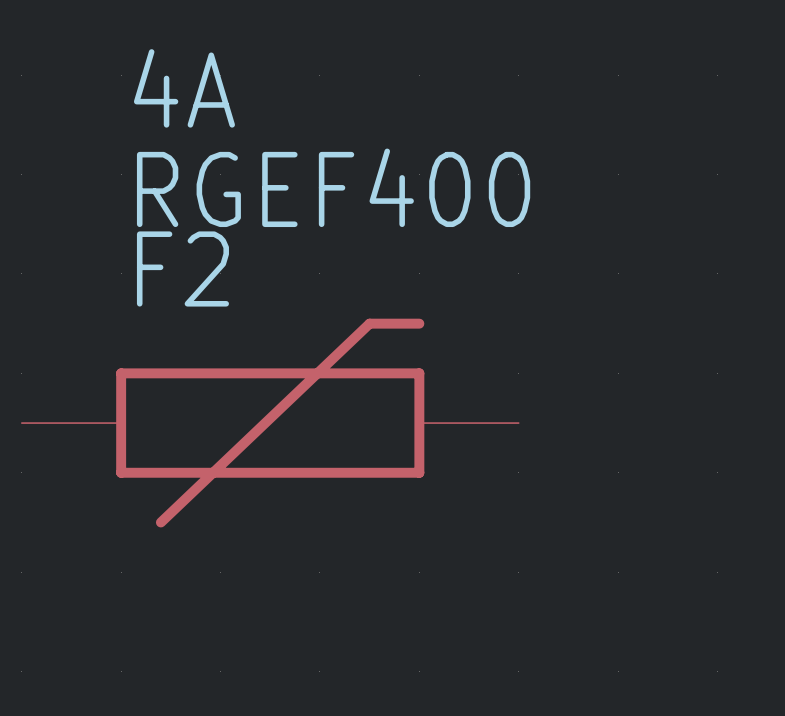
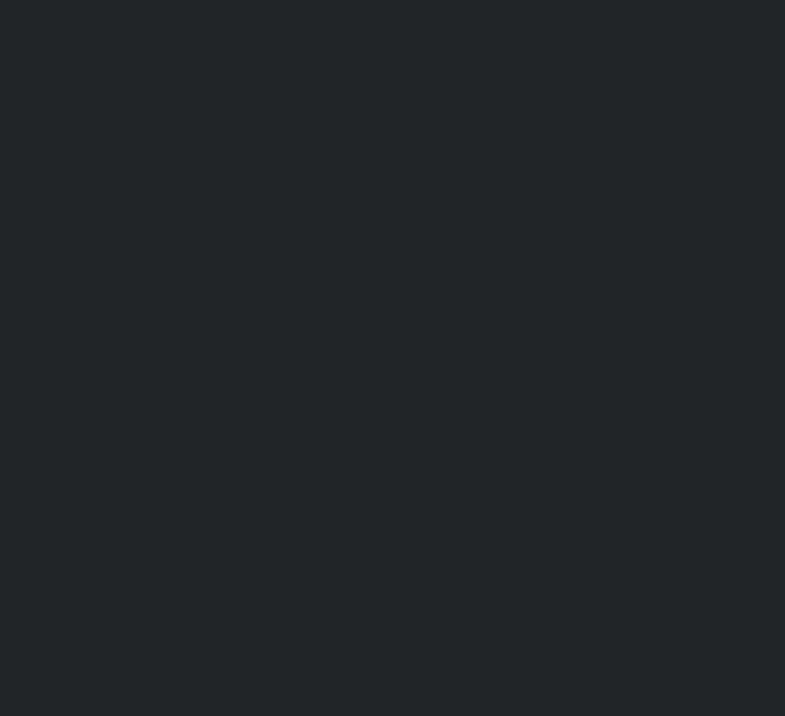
F2: (270, 423) -> none

